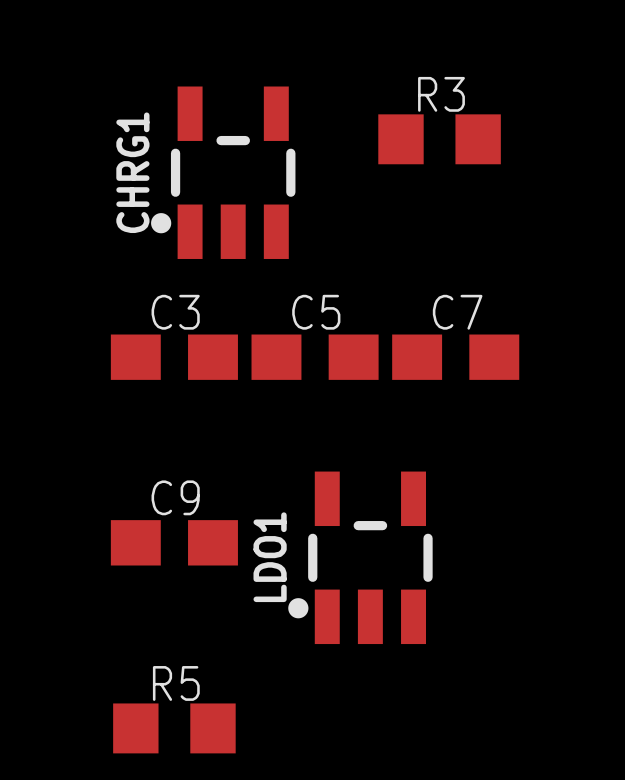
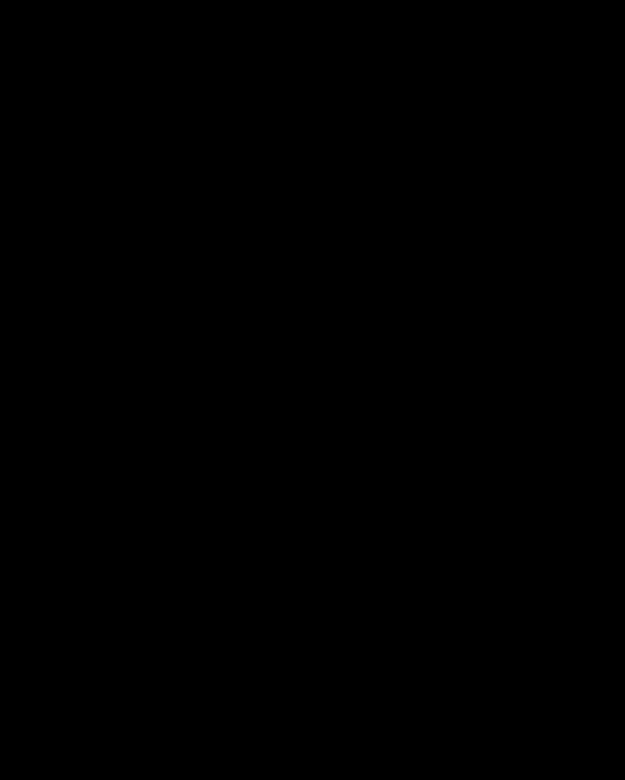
R3: (439, 139) -> none
CHRG1: (223, 172) -> none
C3: (174, 357) -> none
C5: (315, 357) -> none
C7: (455, 357) -> none
C9: (174, 542) -> none
LDO1: (360, 557) -> none
R5: (174, 728) -> none

